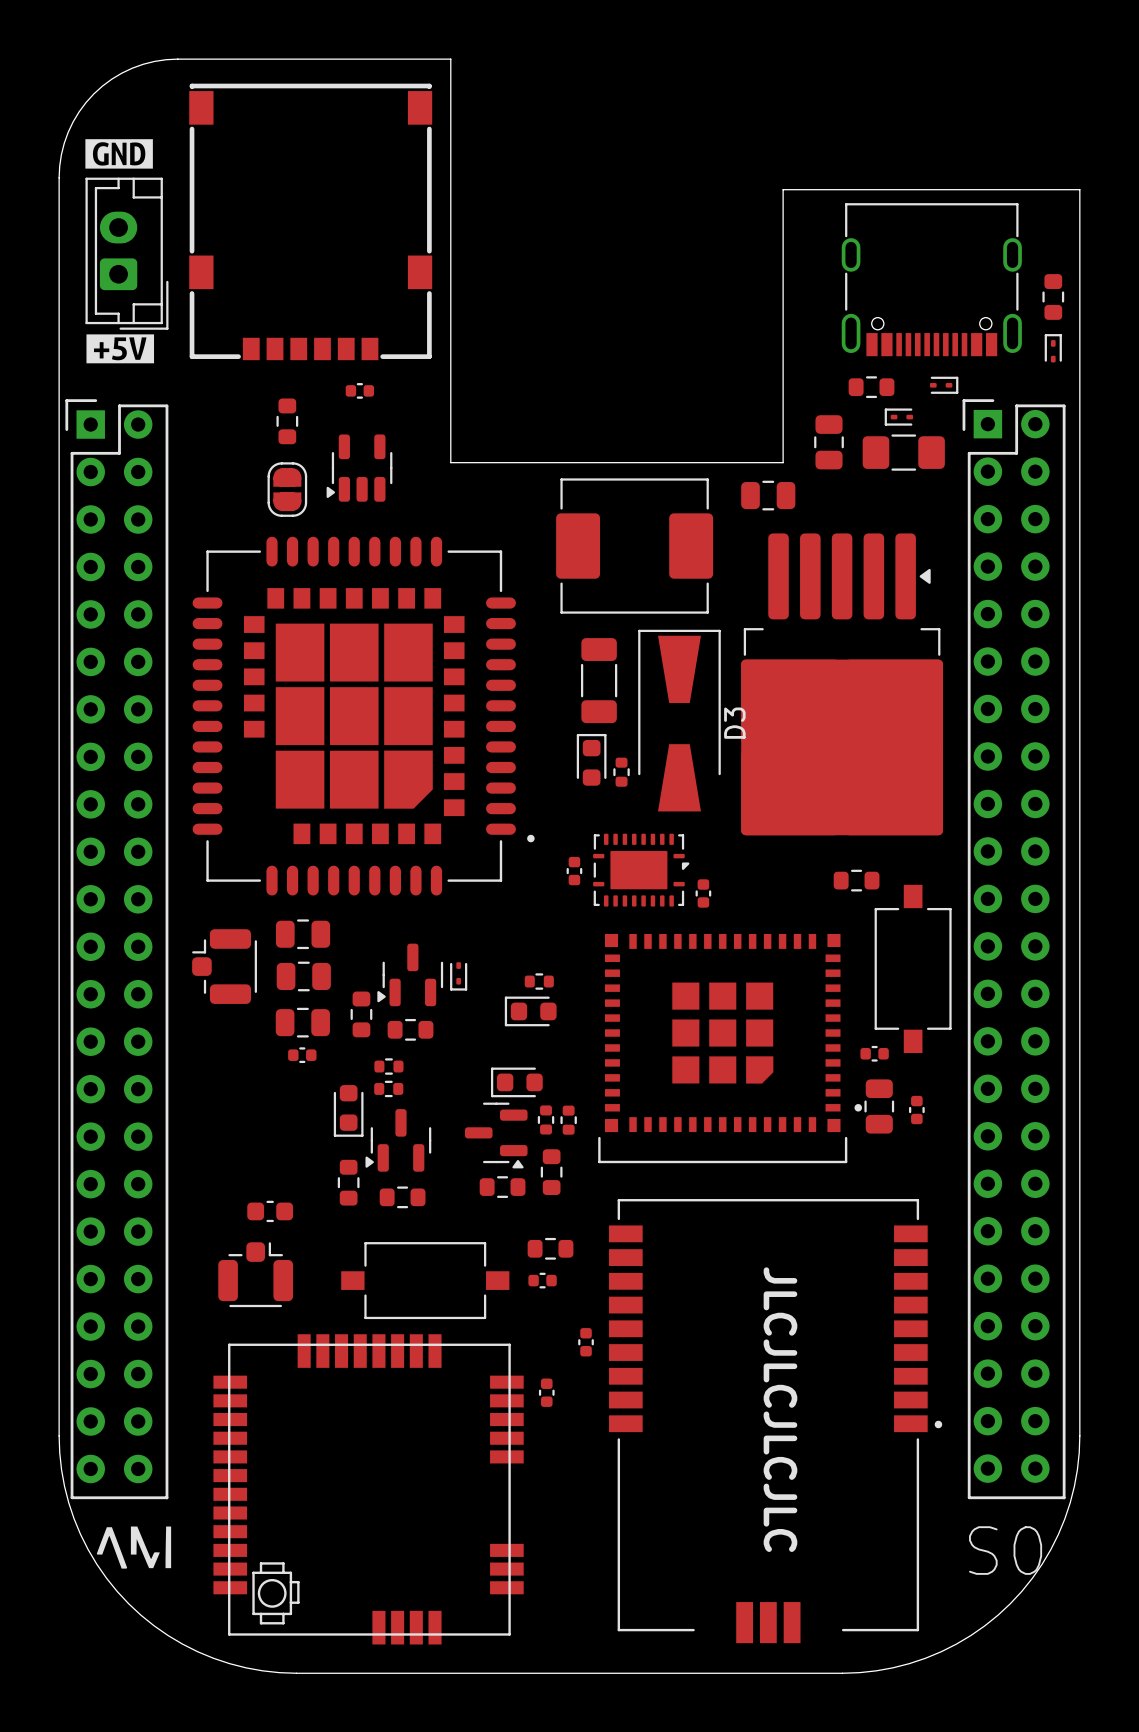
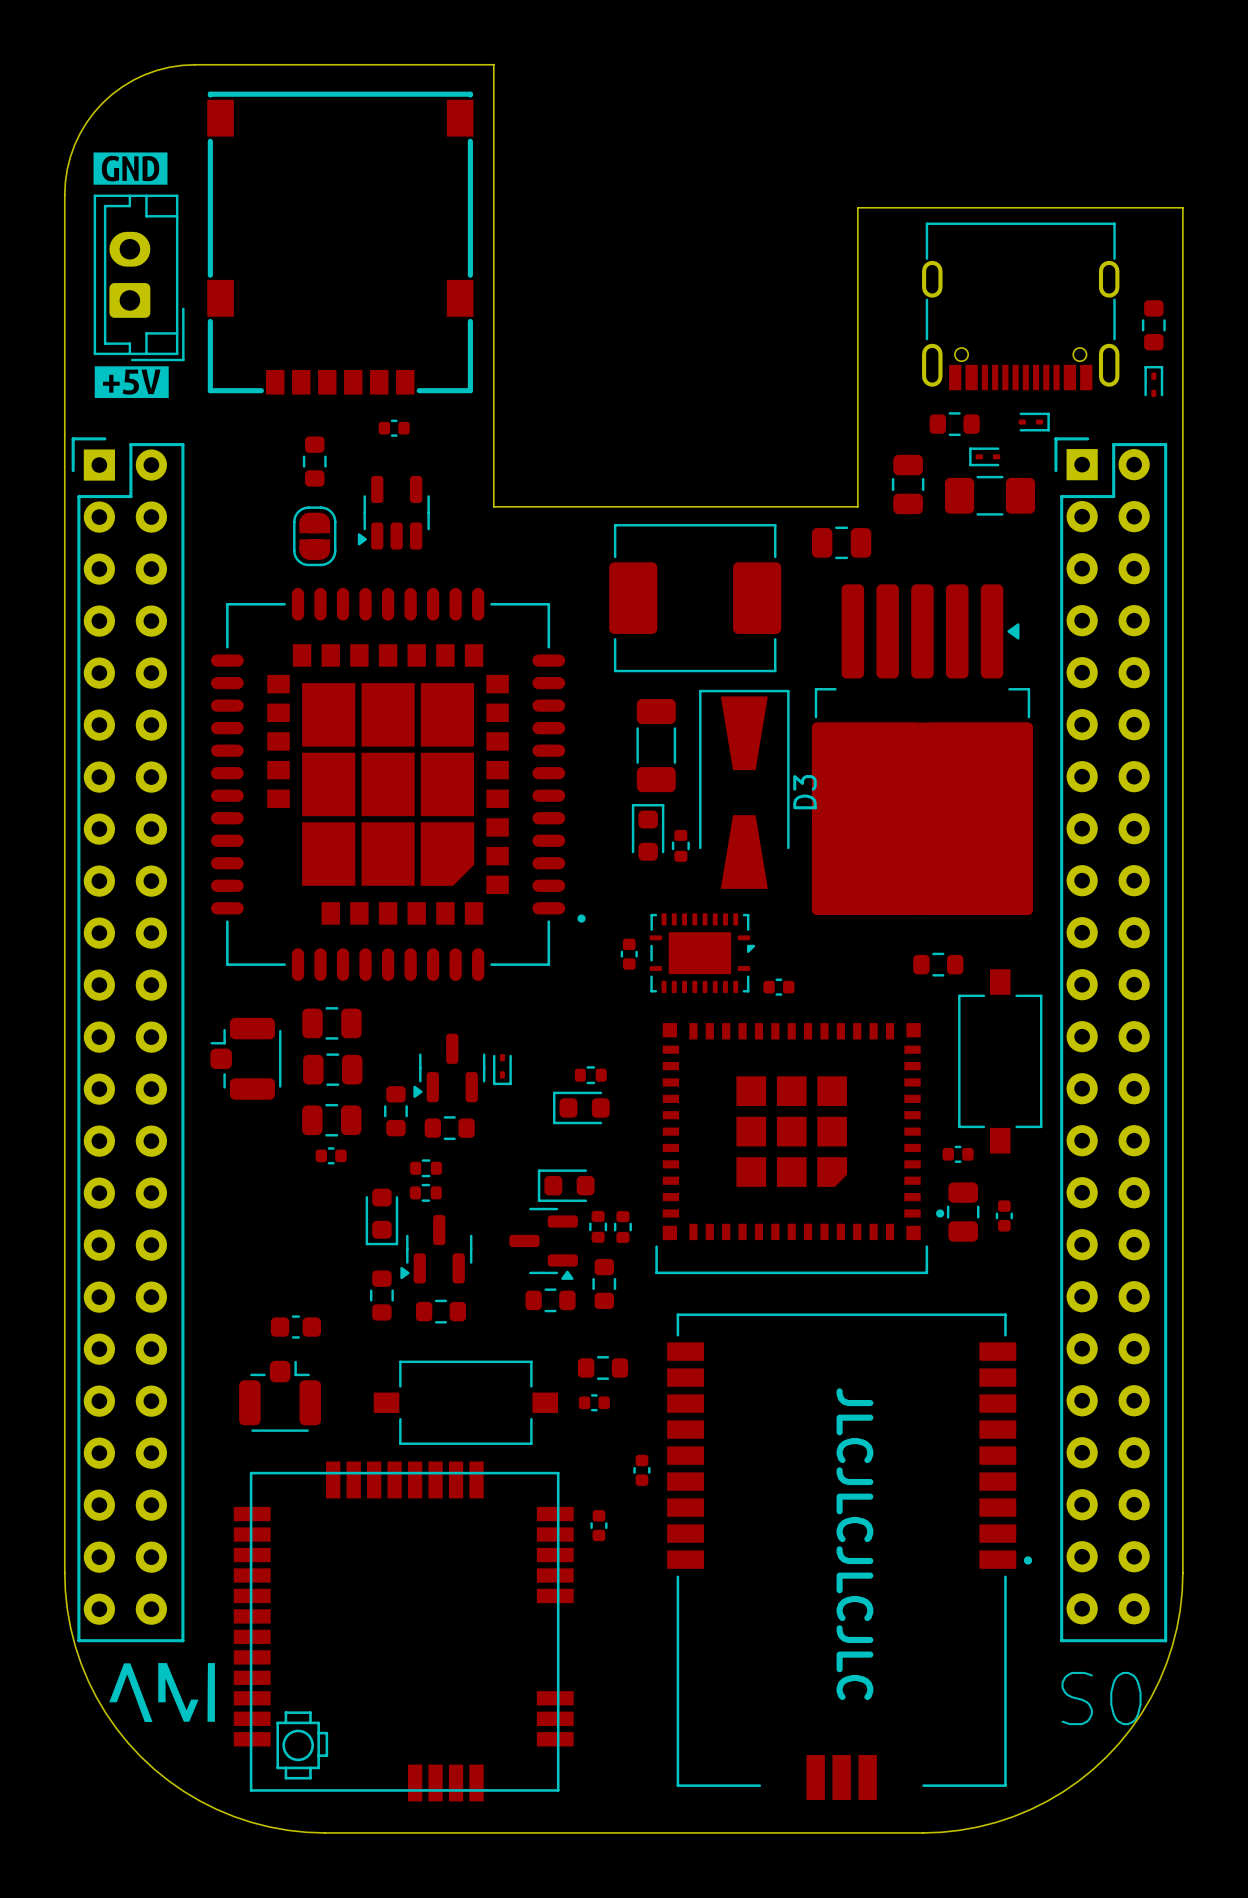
part rotation: 0° (703, 893) -> 90° clockwise (778, 987)
drawing shape: [96, 1526, 172, 1569] -> [109, 1663, 215, 1723]

